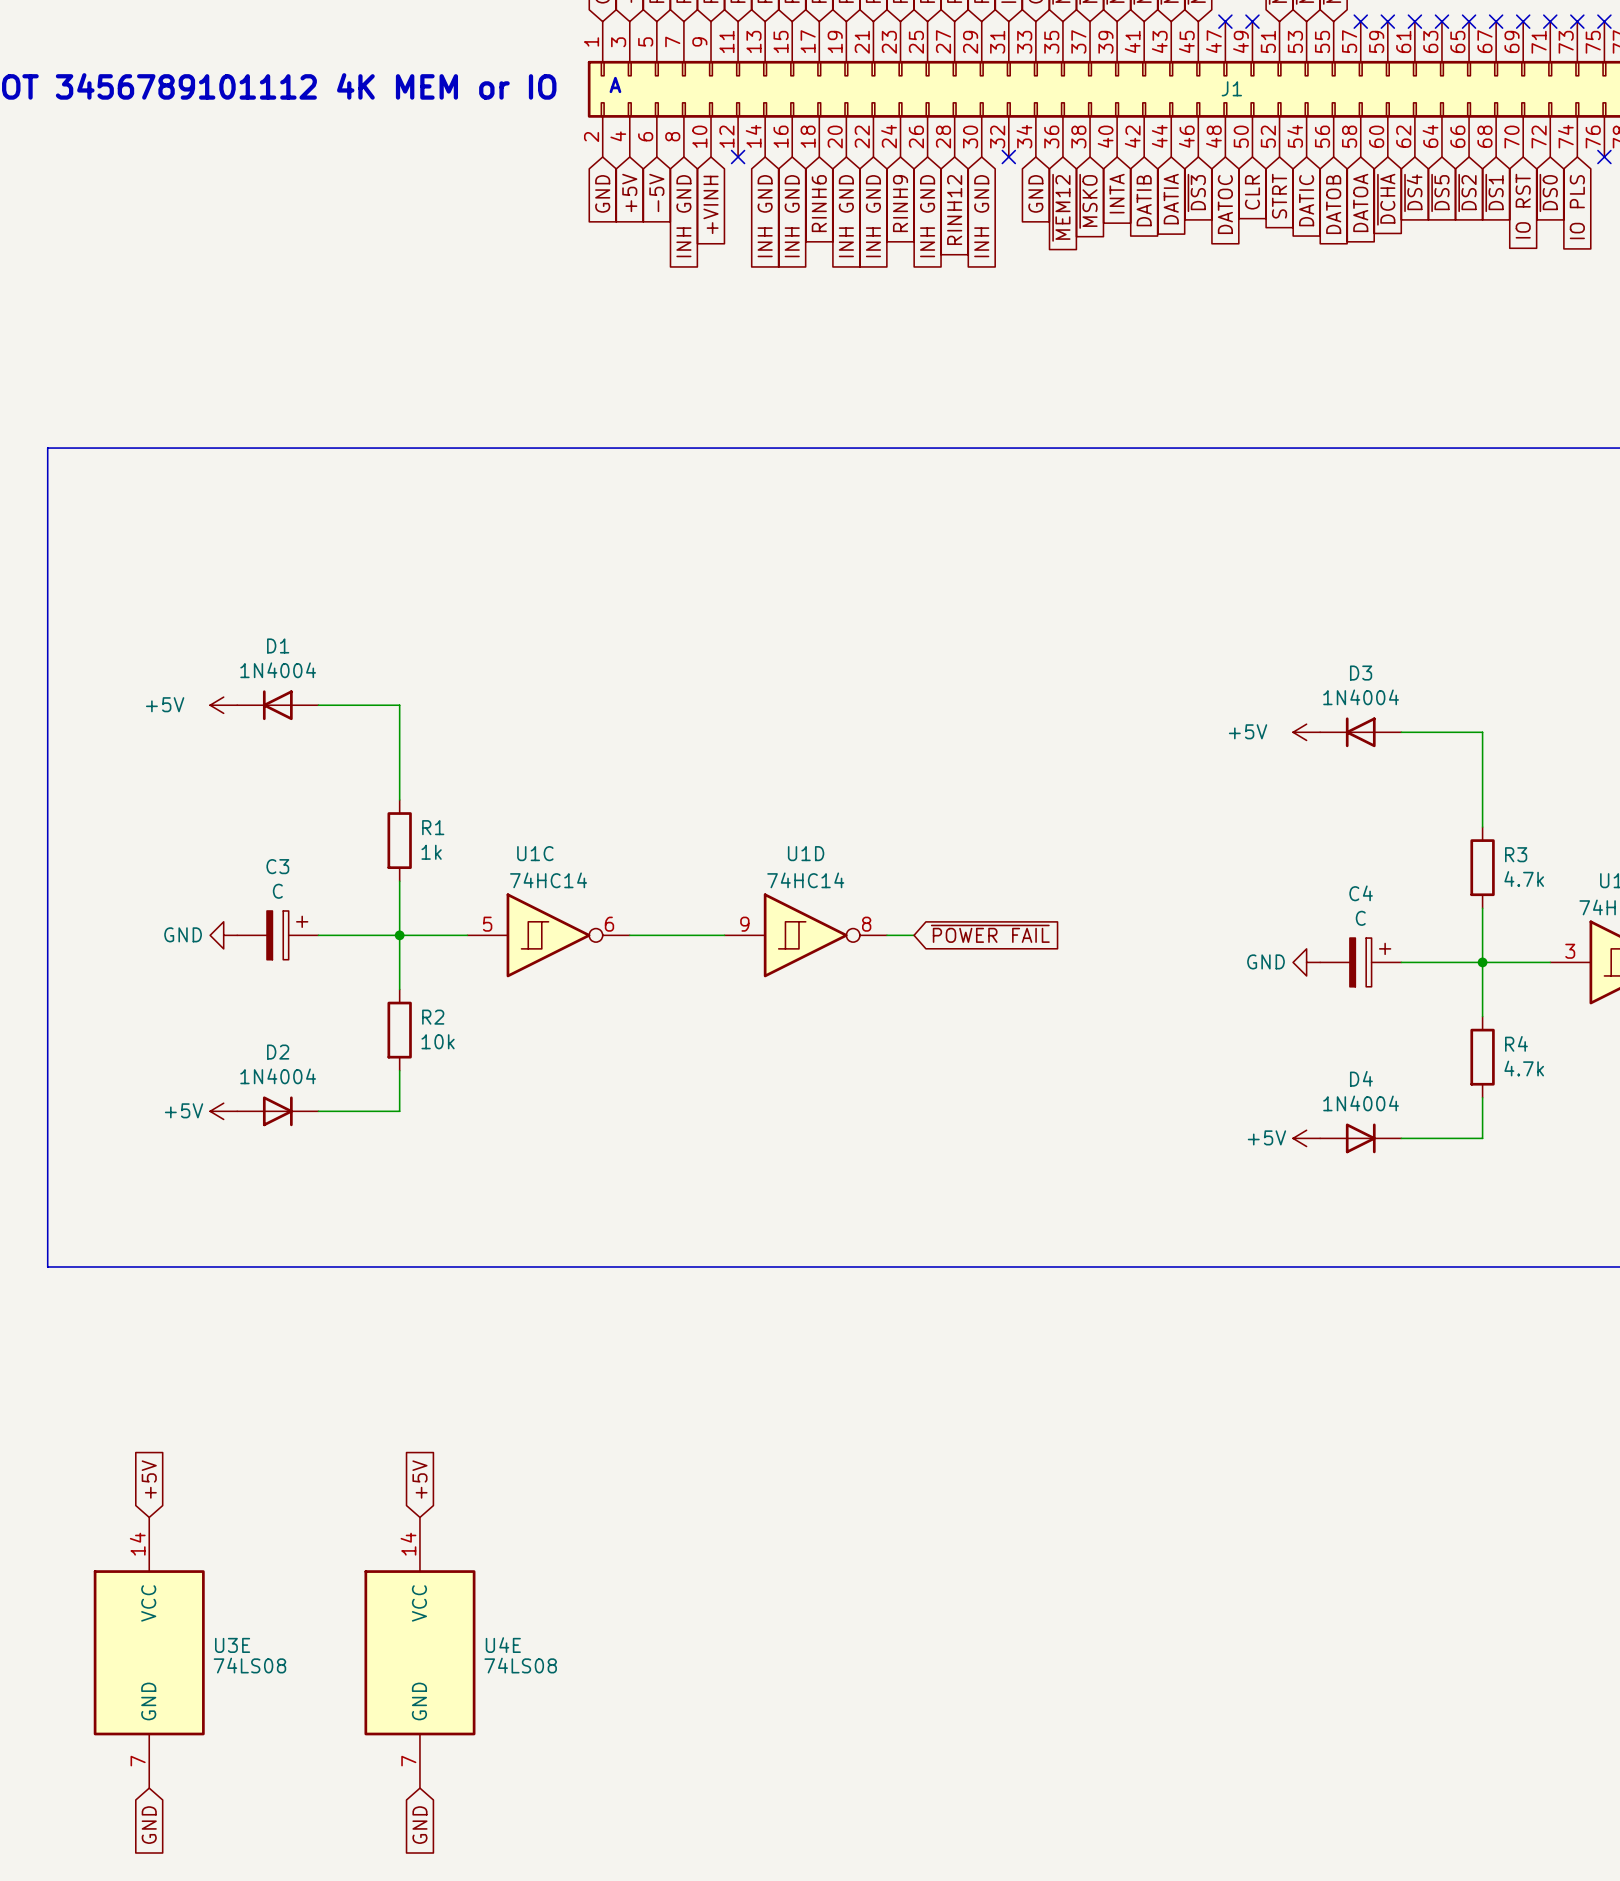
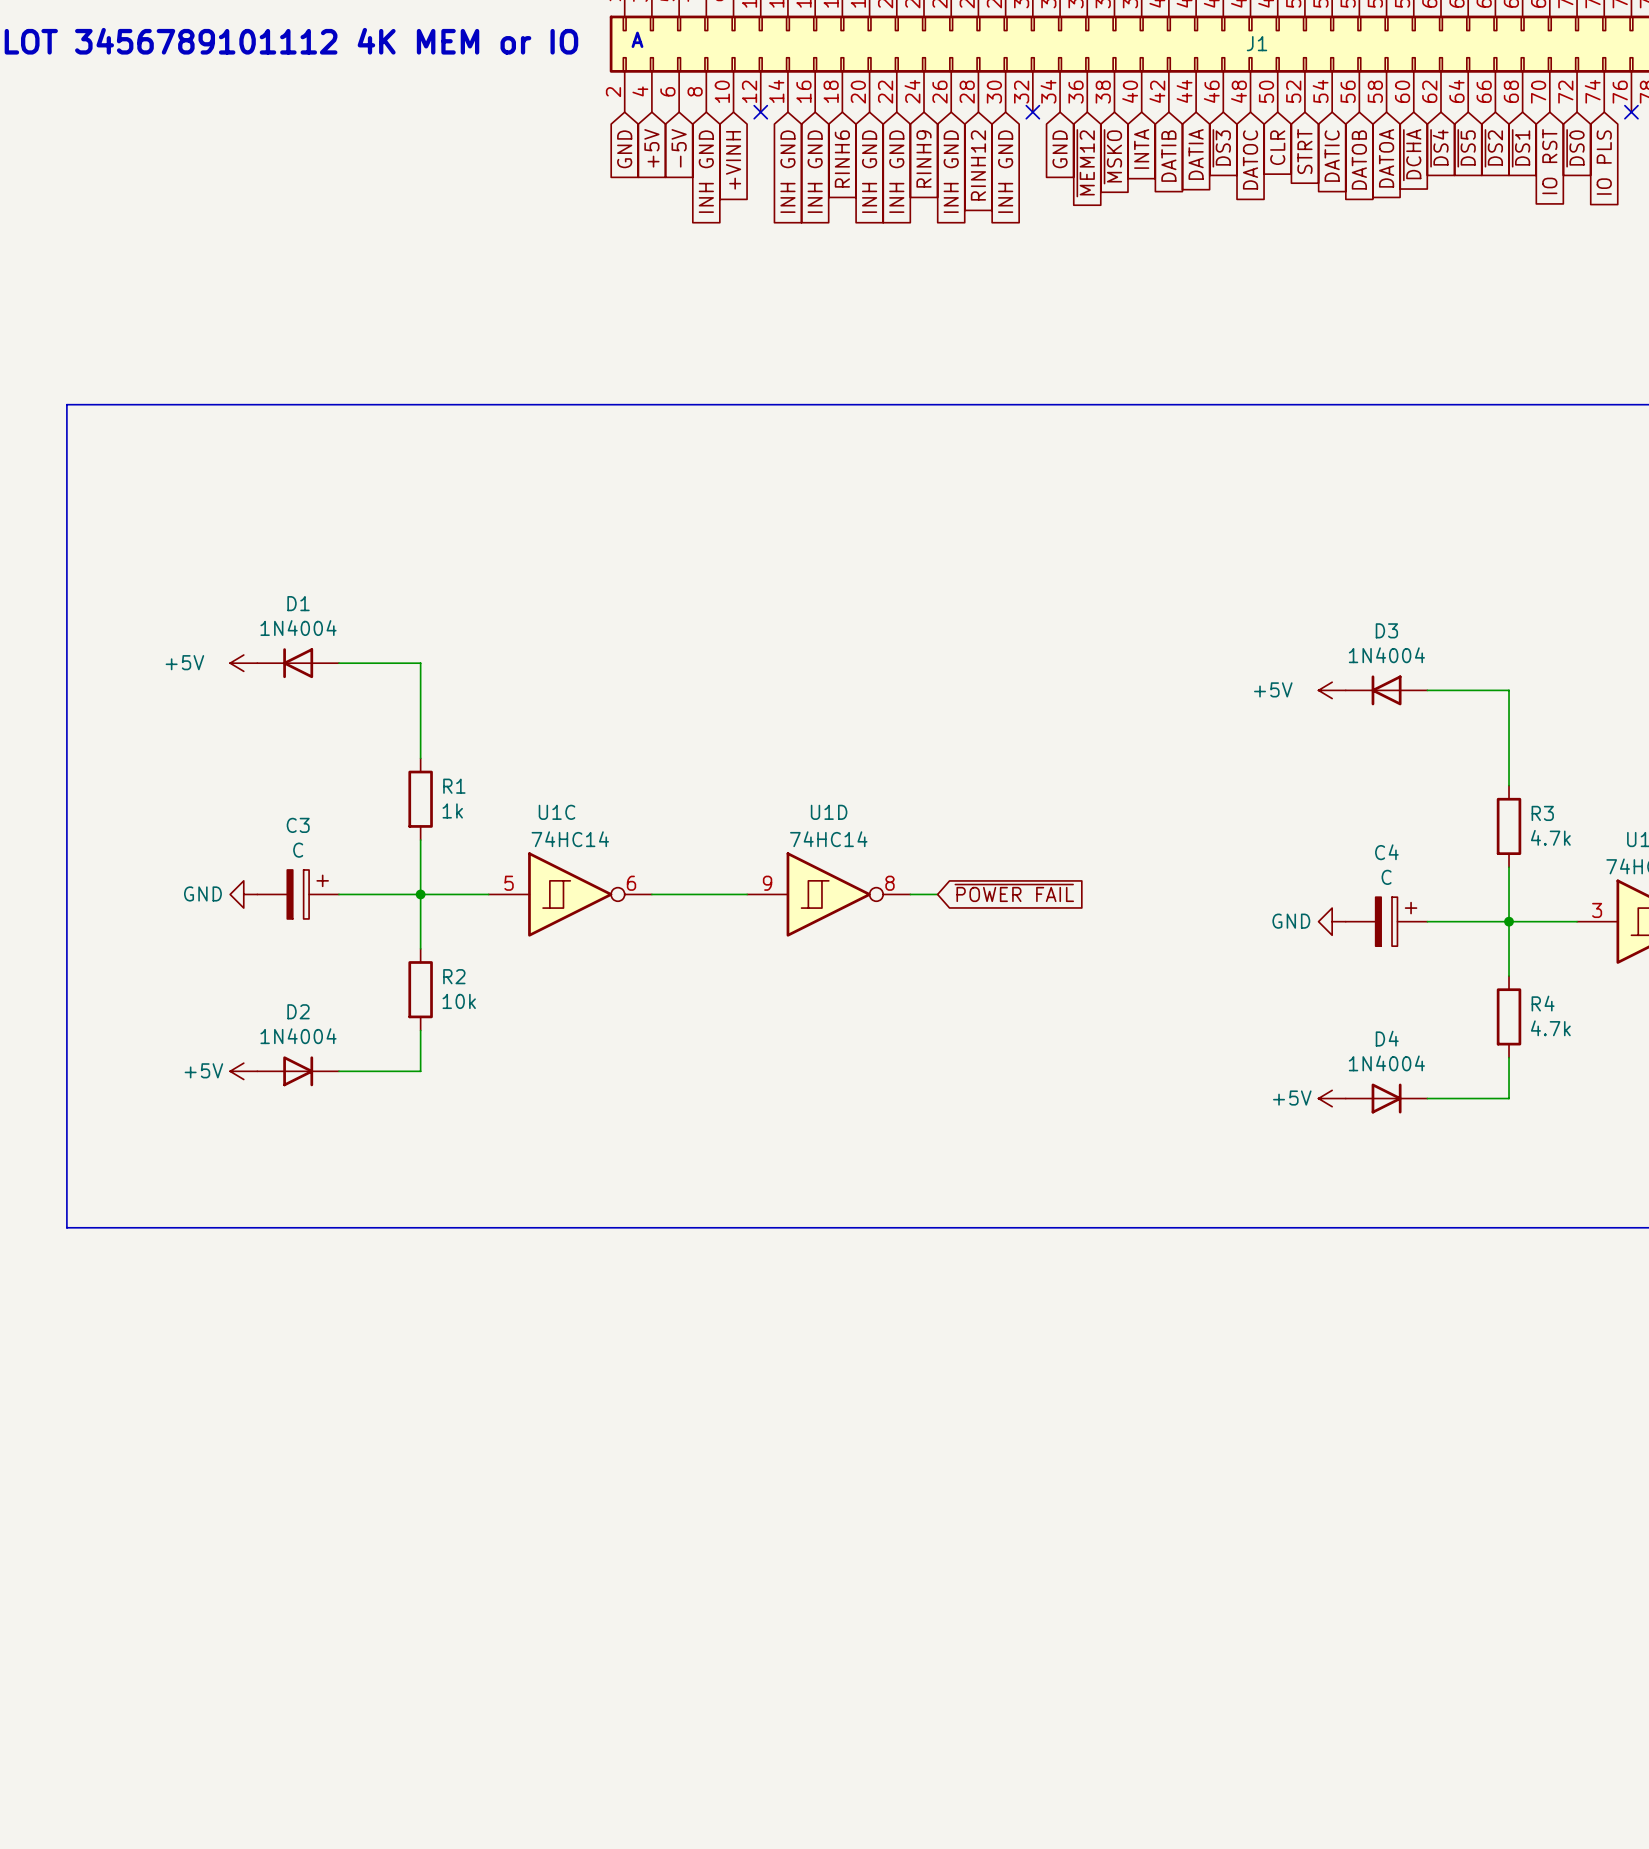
global label: +5V (149, 1479) -> none
global label: +5V (419, 1479) -> none
U3E: 74LS08 (149, 1652) -> none
U4E: 74LS08 (419, 1652) -> none
global label: GND (149, 1825) -> none
global label: GND (419, 1825) -> none

